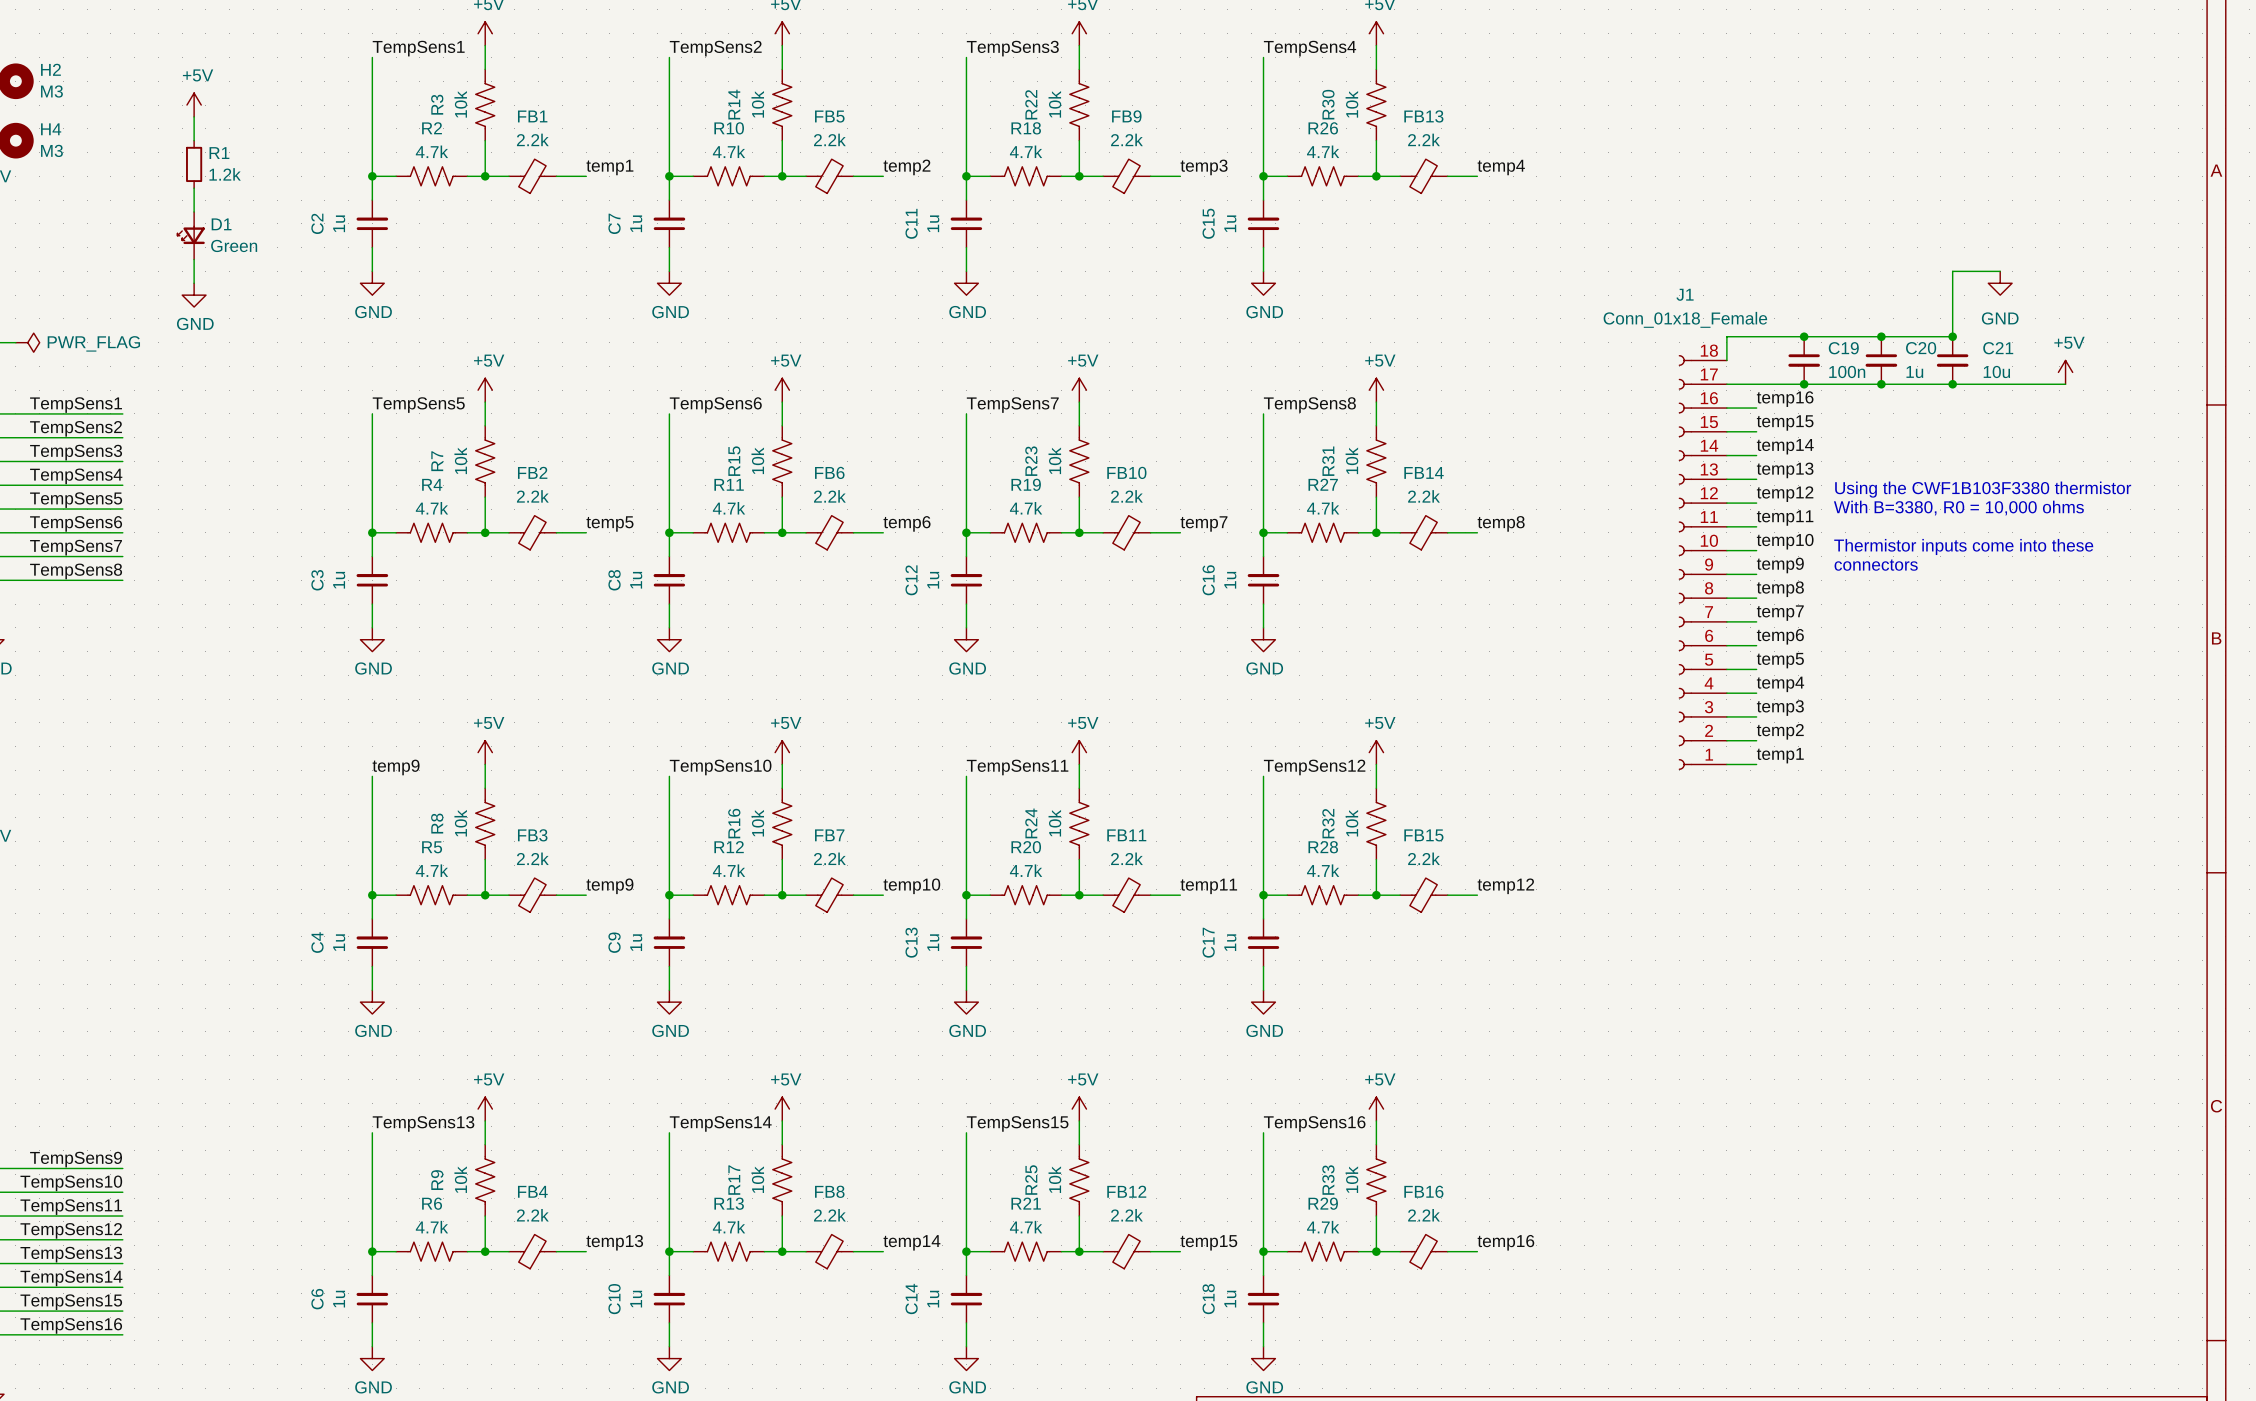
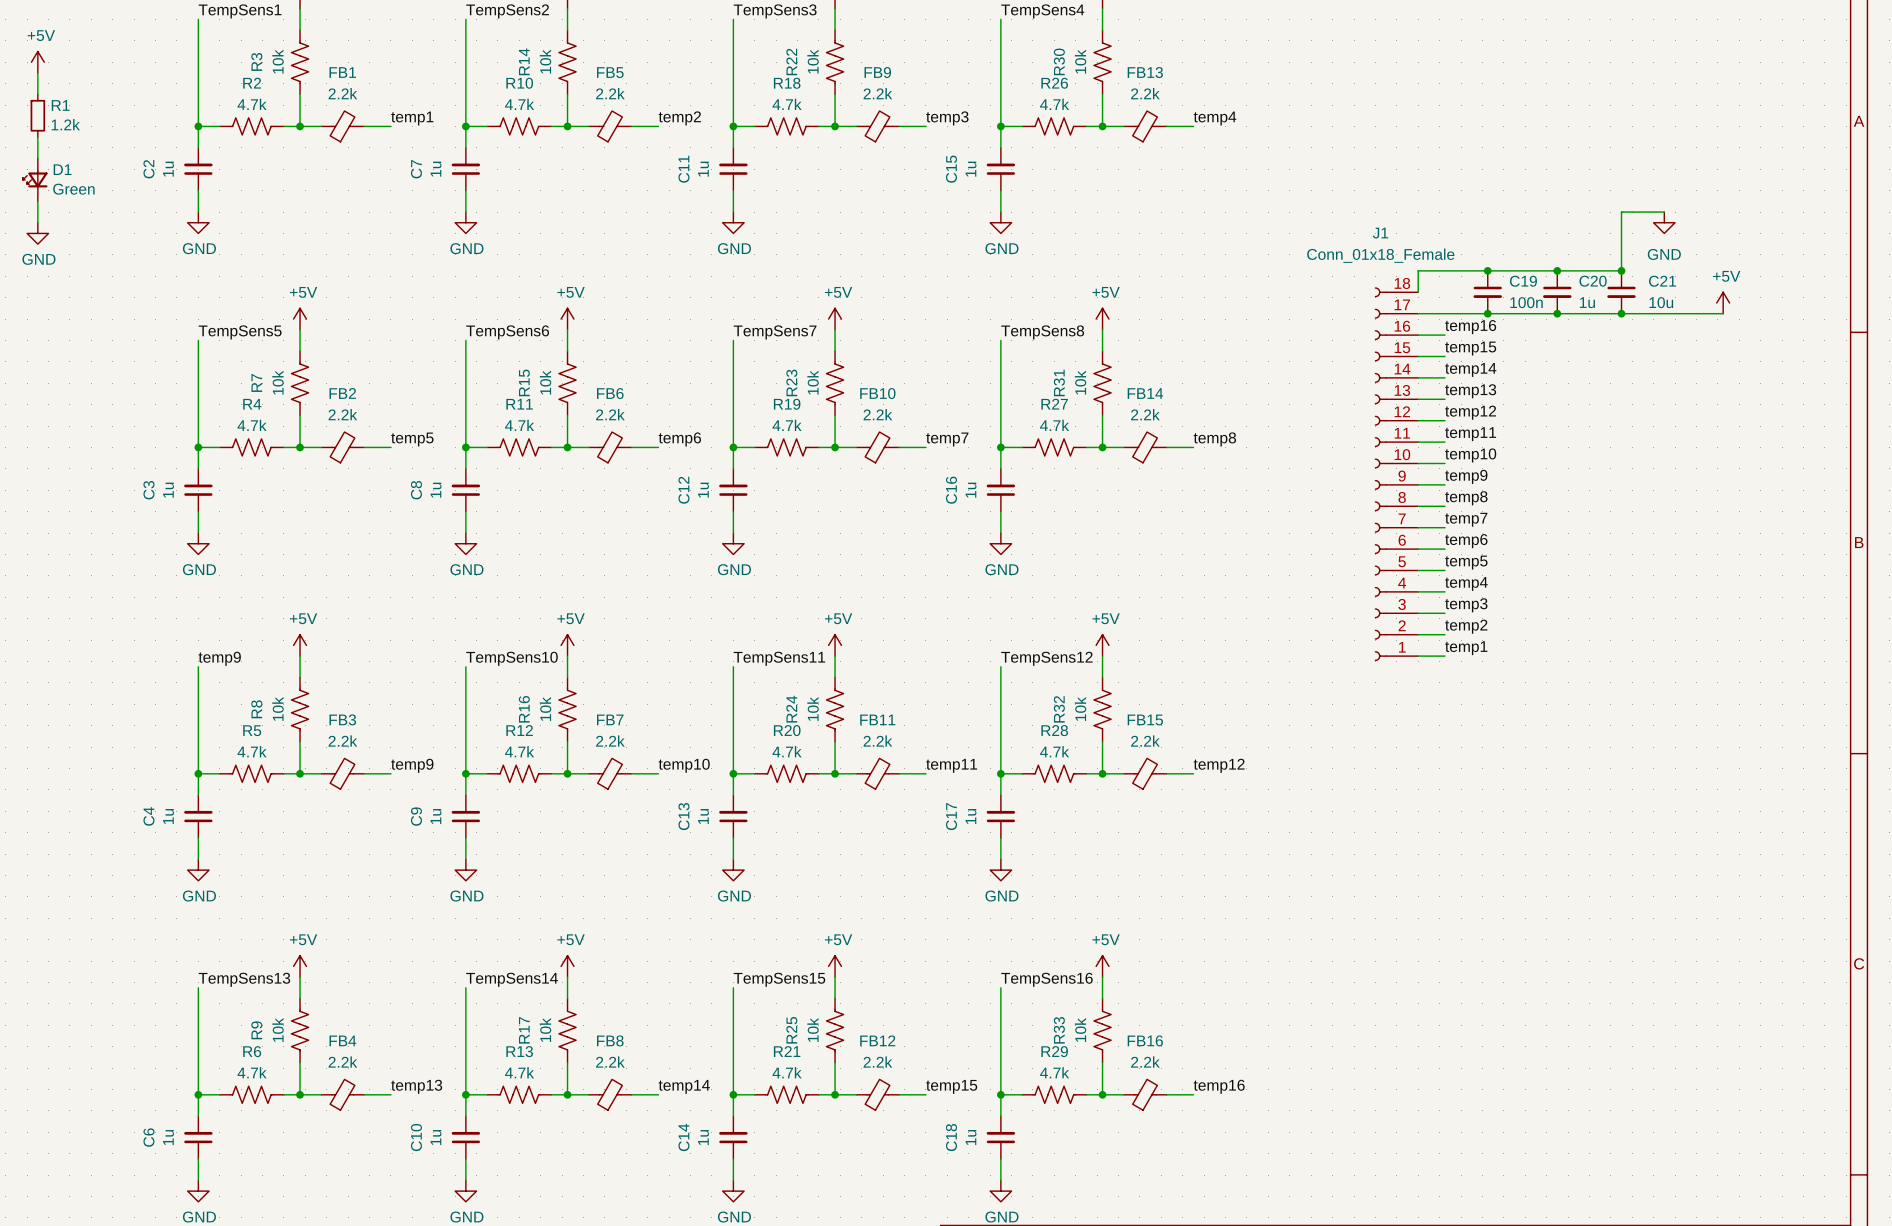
text: Using the CWF1B103F3380 thermistor (1983, 489) -> none
text: With B=3380, R0 = 10,000 ohms (1958, 508) -> none
text: Thermistor inputs come into these (1963, 546) -> none
text: connectors (1876, 565) -> none

